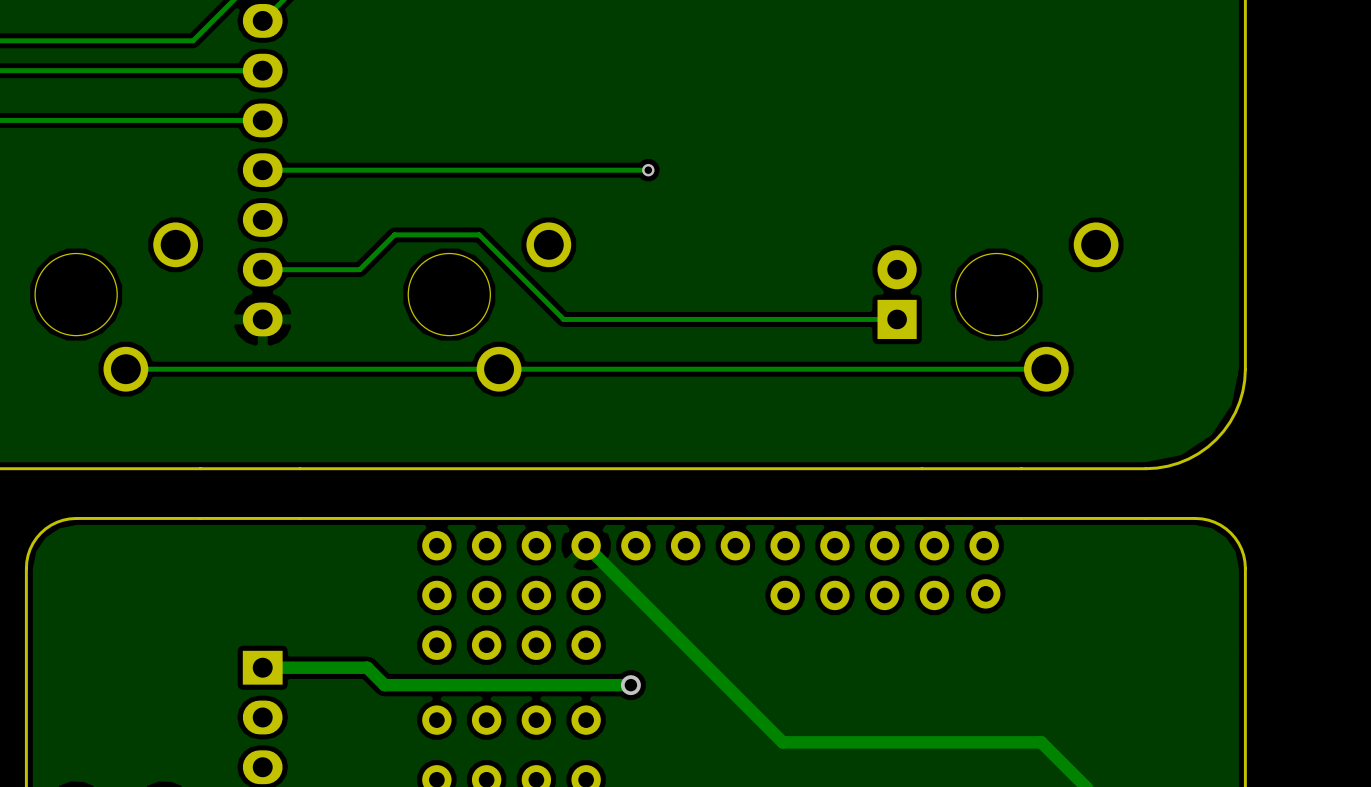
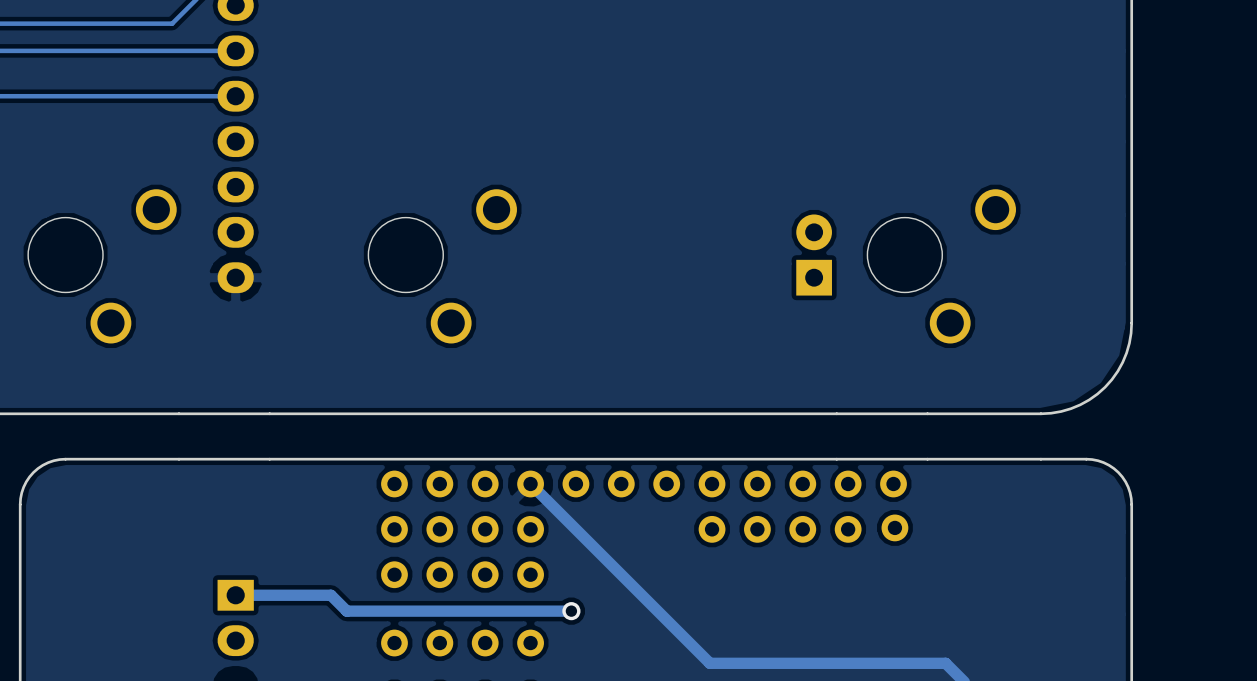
track: (648, 170) (262, 170) -> none
via: (648, 170) -> none
track: (262, 269) (359, 269) (394, 234) (479, 234) (563, 319) (897, 319) -> none
track: (1046, 369) (125, 369) -> none

